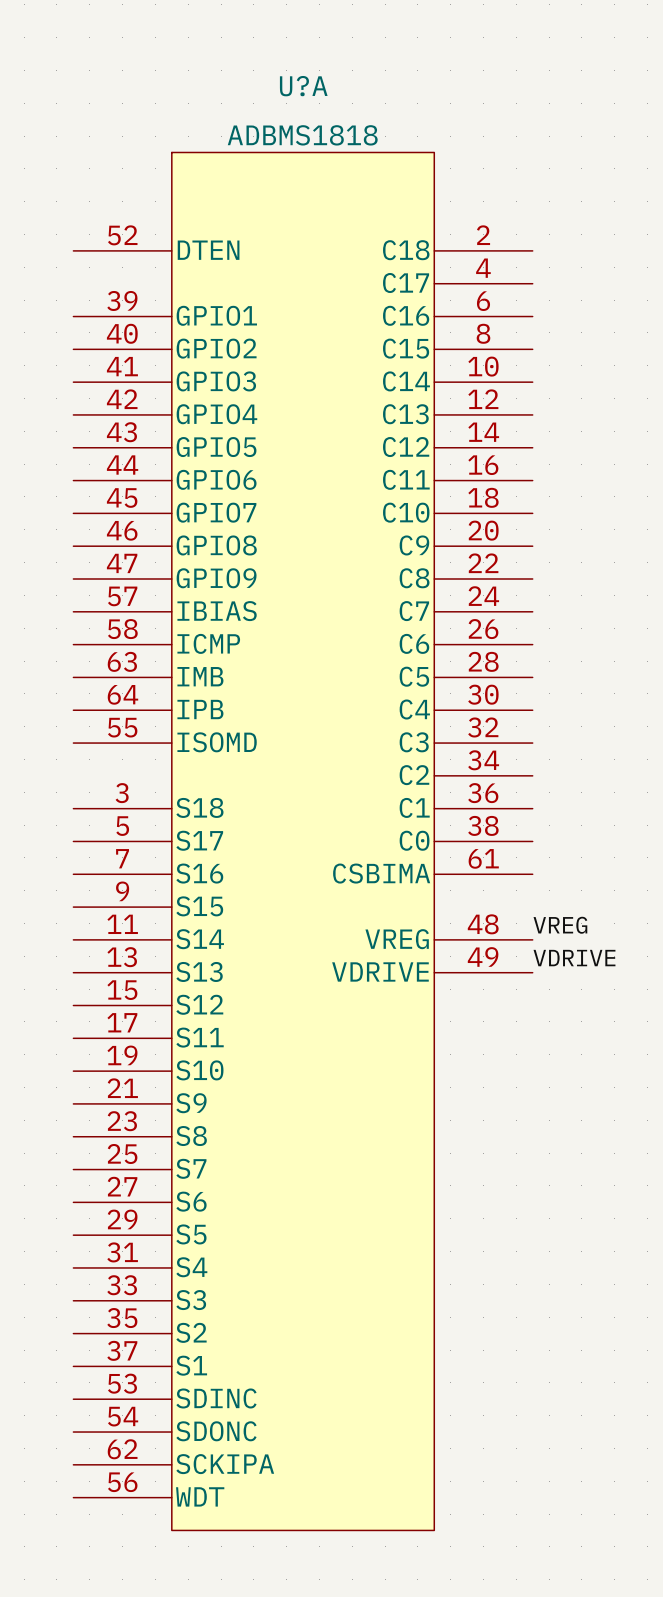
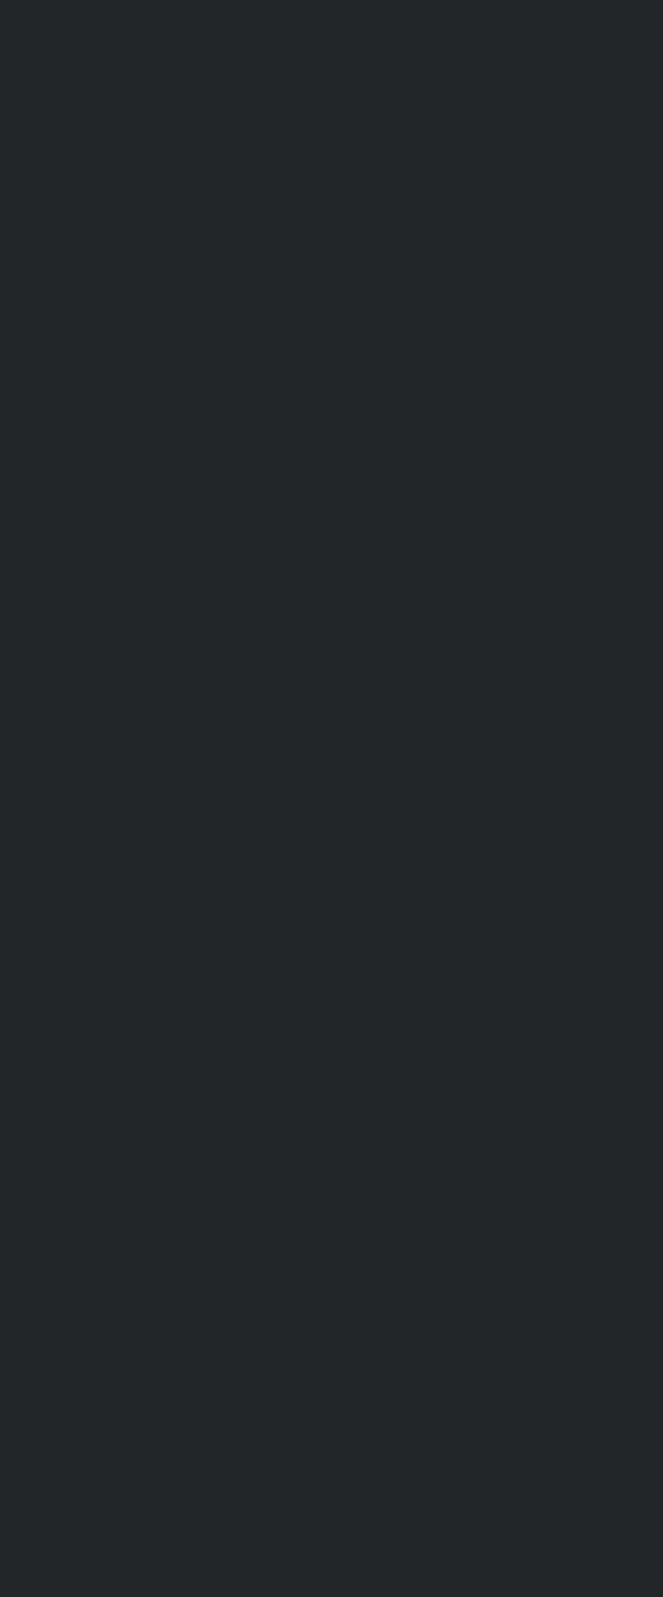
U?A: ADBMS1818 (303, 841) -> none
label: VREG (560, 925) -> none
label: VDRIVE (574, 958) -> none

